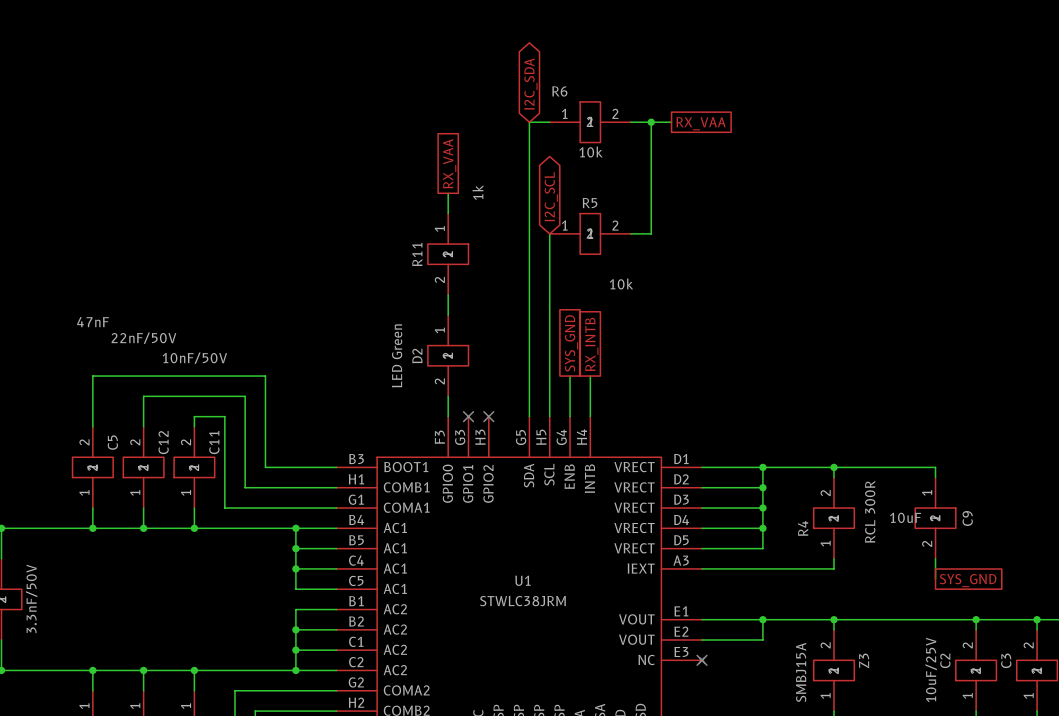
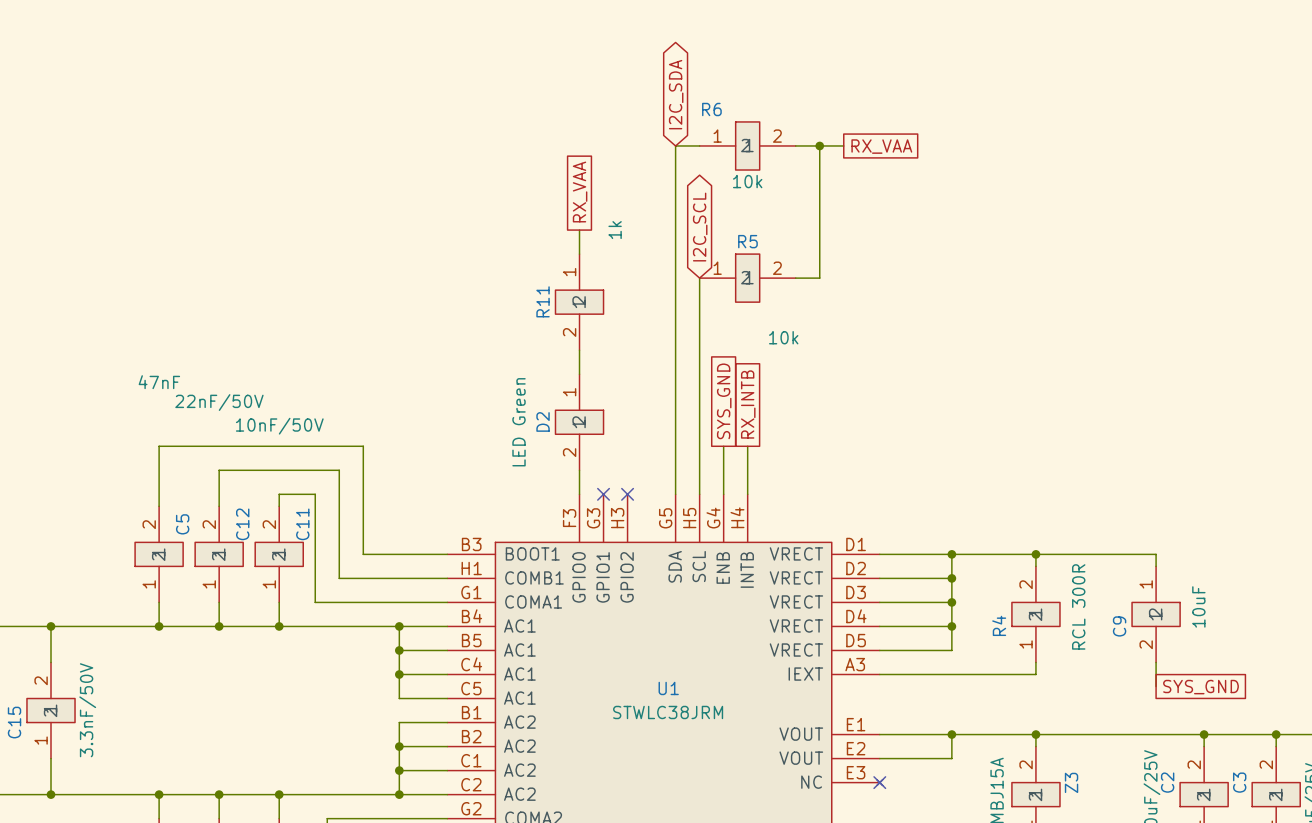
C9 value rotation: 0° (905, 517) -> 90° counterclockwise (1198, 606)
C9 value position: 10uF (905, 517) -> 10uF (1198, 606)
C9 name position: C9 (967, 518) -> C9 (1119, 626)

